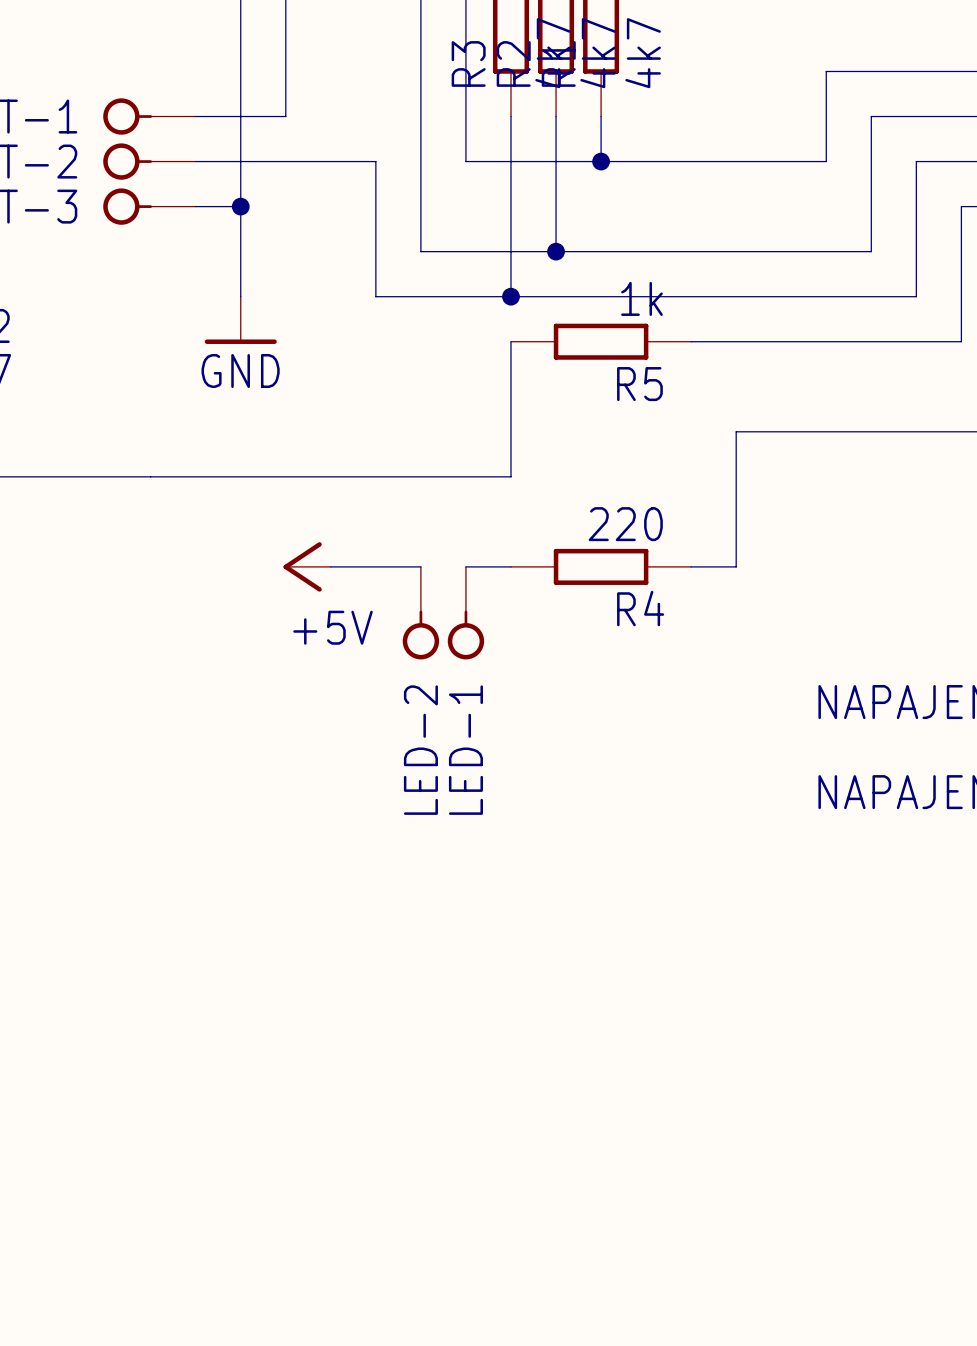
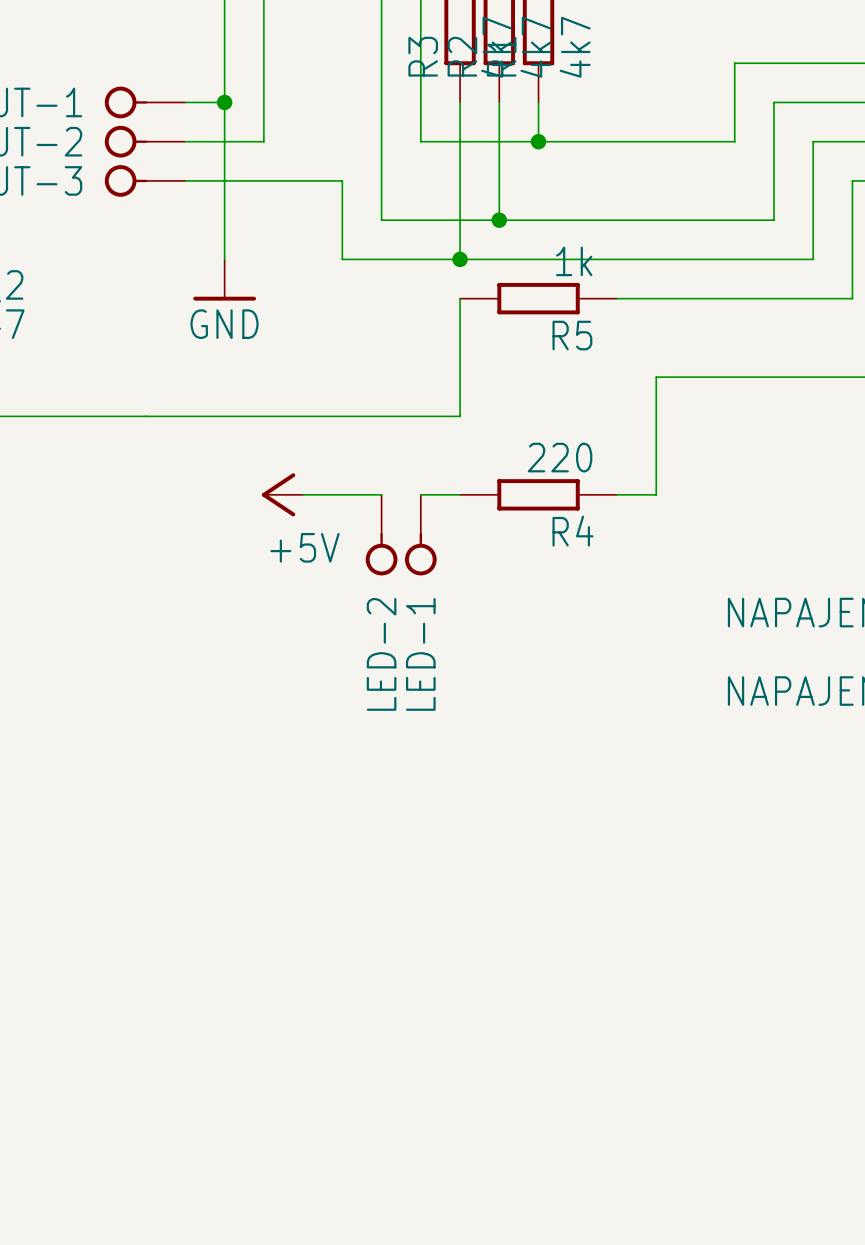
wire: (240, 116) (285, 116) -> (263, 141) (263, 102)
wire: (285, 161) (375, 161) (375, 206) -> (224, 180) (342, 180)
junction position: (240, 206) -> (224, 102)

